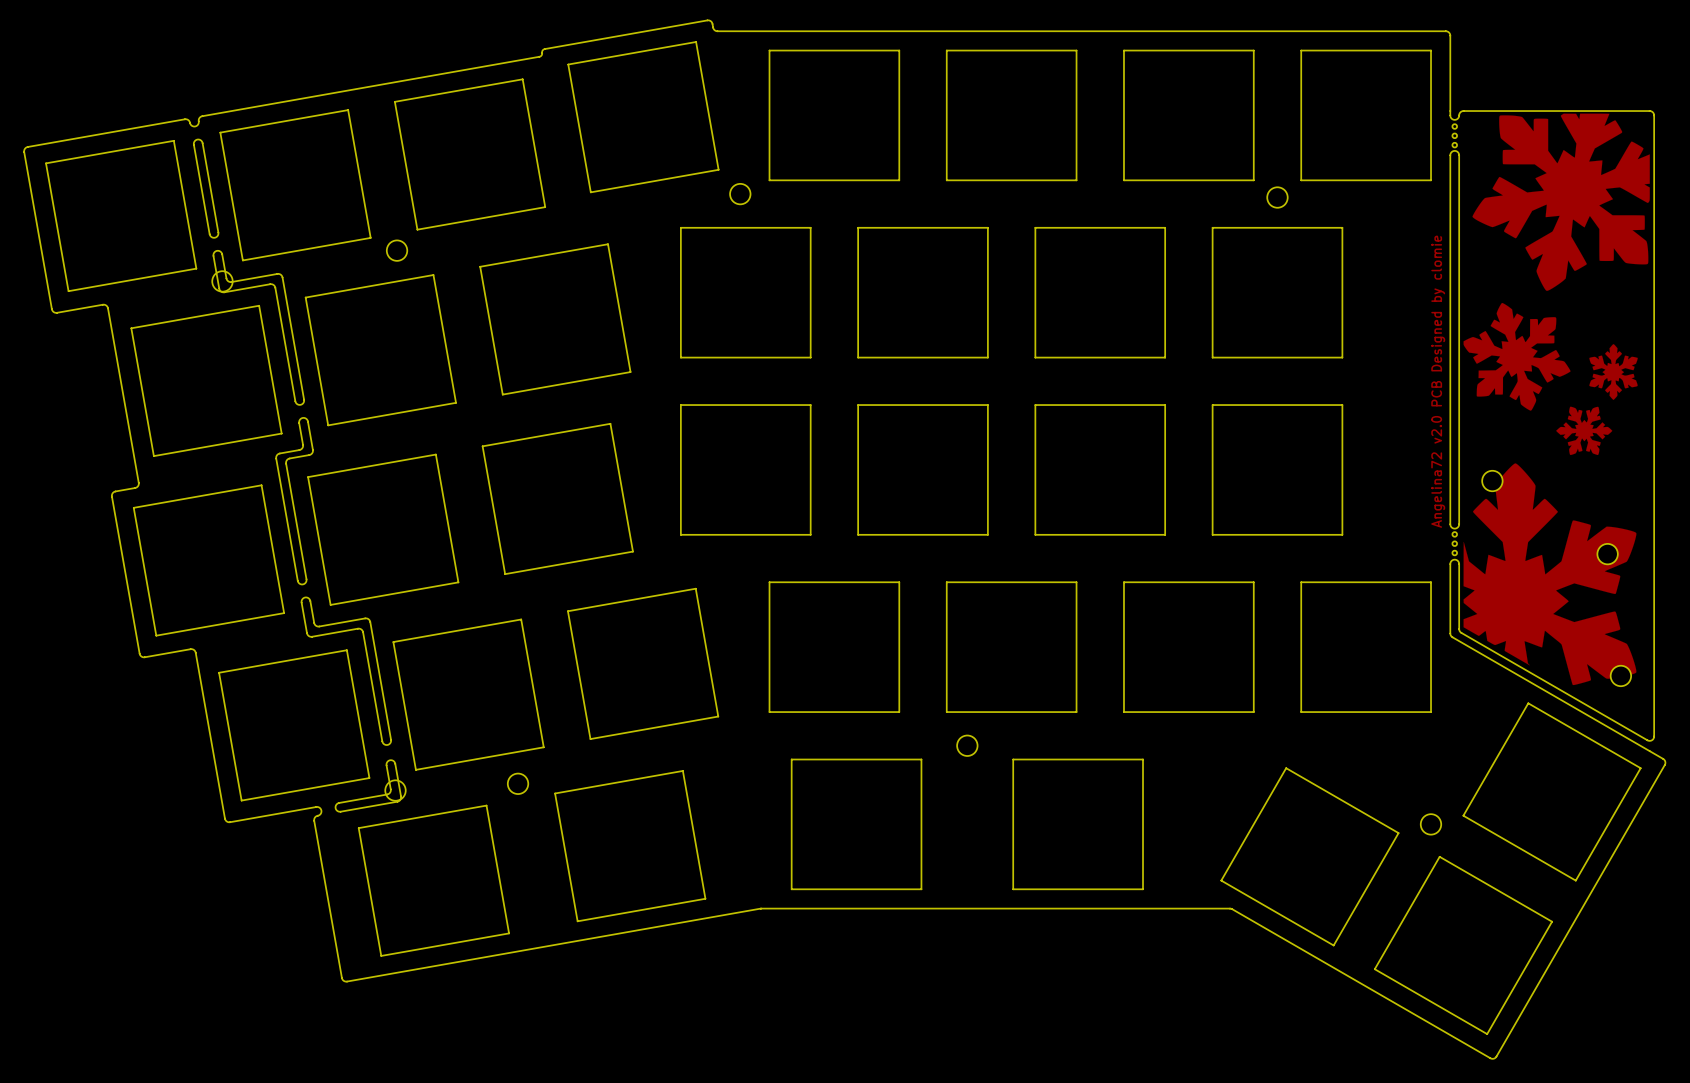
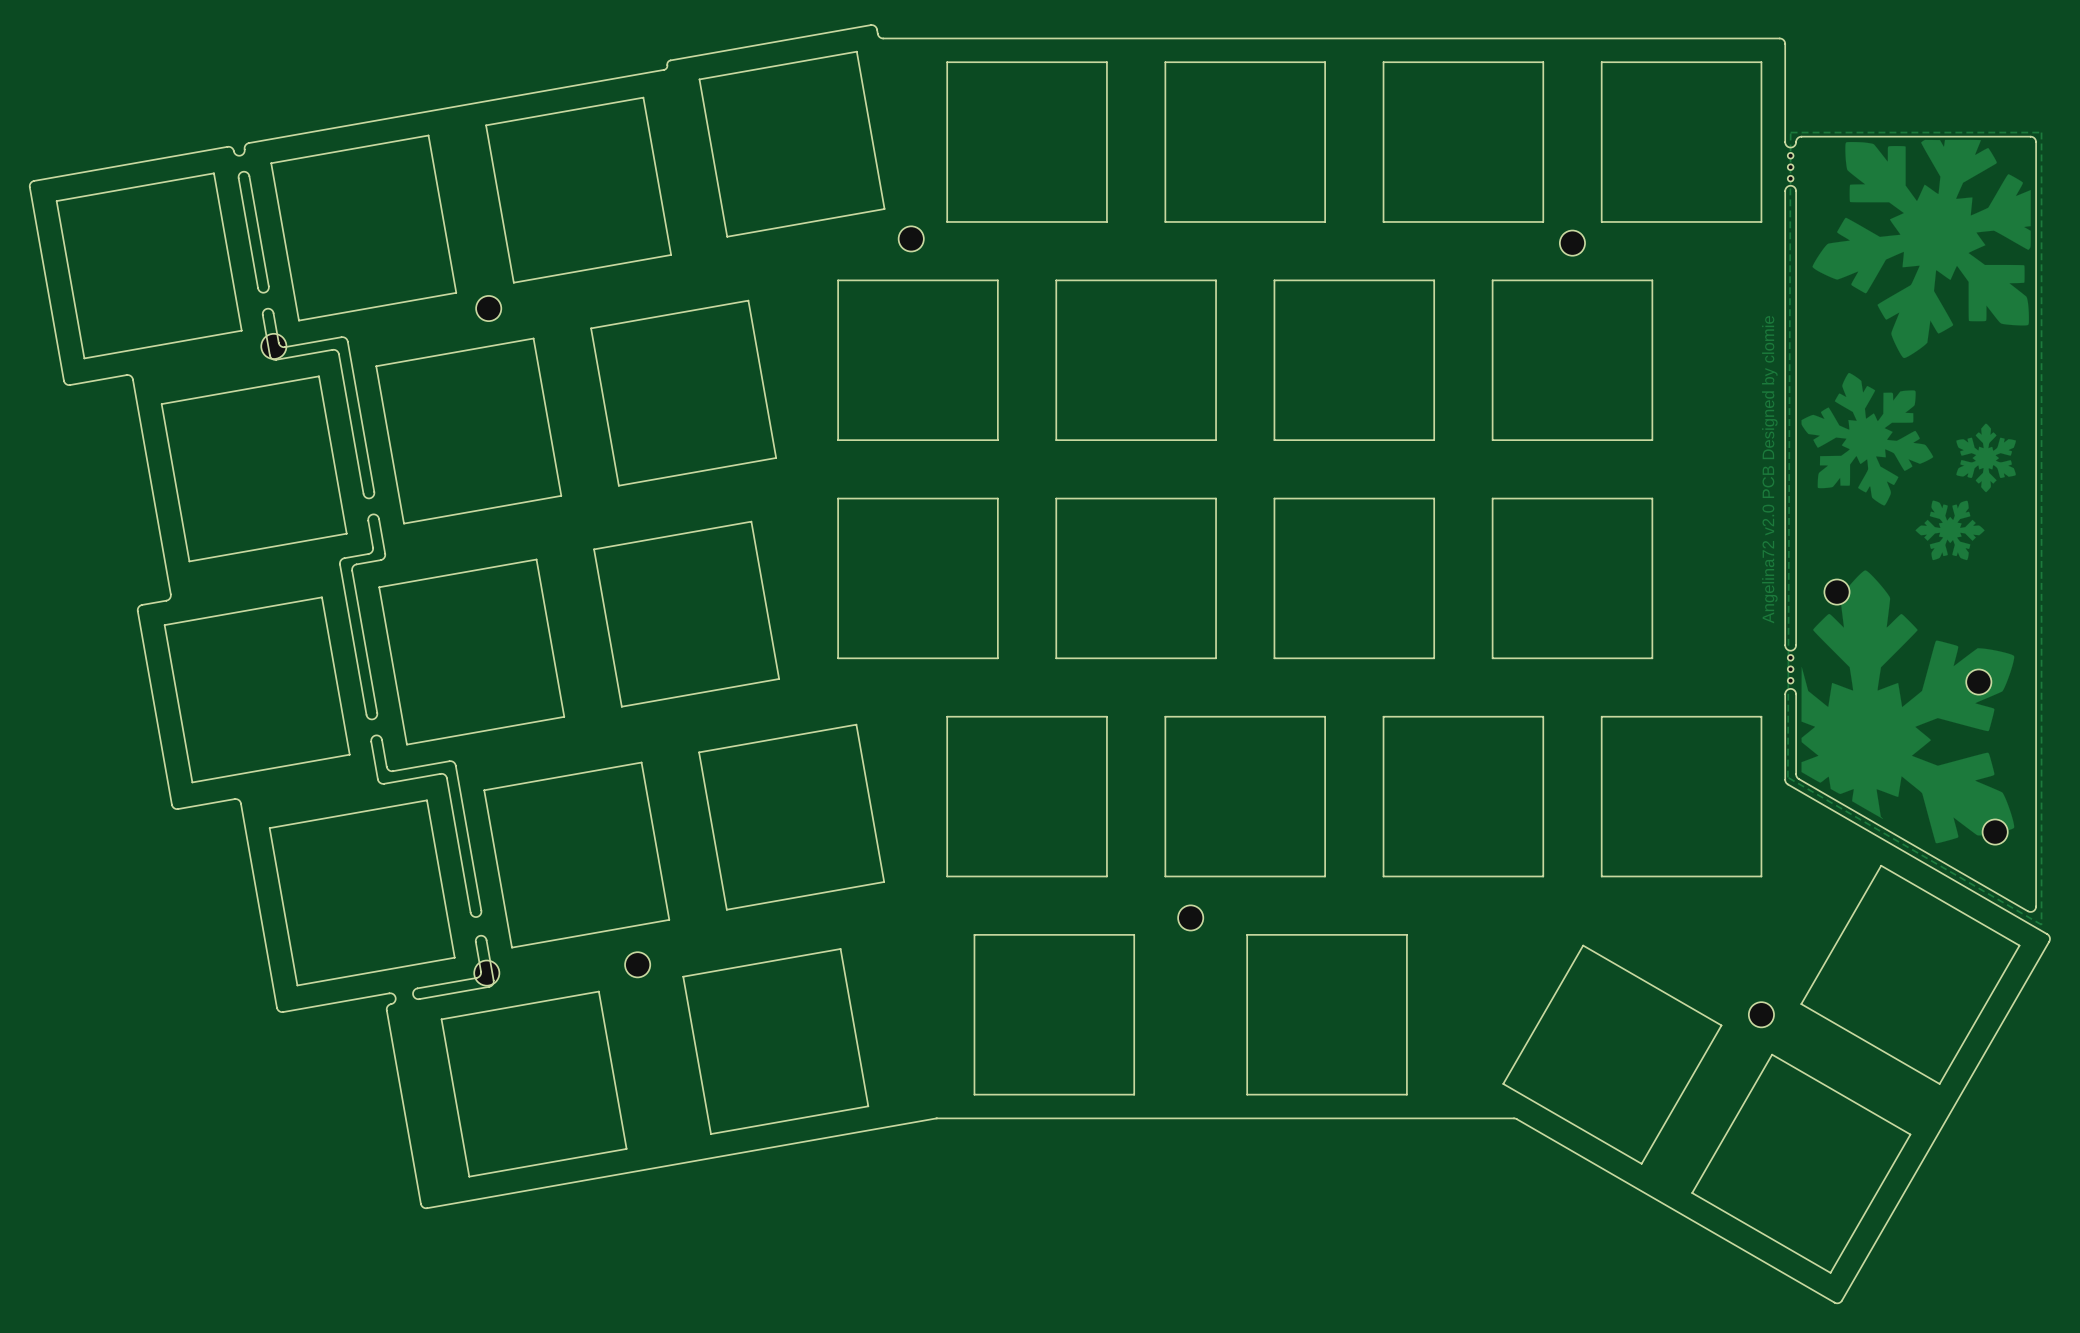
drawing: [23, 20, 1666, 1060] -> none
board edge: none -> (870, 25) (670, 60) (664, 69) (249, 143) (245, 145) (243, 153) (240, 155) (235, 154) (231, 147) (227, 146) (34, 180) (30, 184) (64, 381) (70, 385) (127, 375) (132, 379) (170, 595) (167, 600) (140, 605) (137, 610) (172, 805) (177, 809) (234, 799) (240, 802) (278, 1010) (283, 1012) (389, 993) (394, 995) (394, 1001) (388, 1005) (386, 1010) (422, 1206) (427, 1208) (936, 1118) (1514, 1118) (1834, 1302) (1840, 1302) (2049, 938) (2047, 934) (1786, 783) (1785, 779) (1785, 693) (1790, 688) (1796, 693) (1796, 774) (1798, 778) (2027, 911) (2034, 909) (2034, 138) (2030, 136) (1801, 136) (1797, 138) (1793, 146) (1788, 147) (1785, 142) (1785, 43) (1780, 38) (883, 38) (878, 35) (875, 26) (870, 25)
zone outline: none -> (1790, 132) (2041, 132) (2041, 924) (1787, 777) (1790, 132)
board edge: none -> (1785, 191) (1785, 645) (1786, 649) (1790, 650) (1794, 649) (1796, 645) (1796, 191) (1794, 187) (1790, 185) (1786, 187) (1785, 191)

